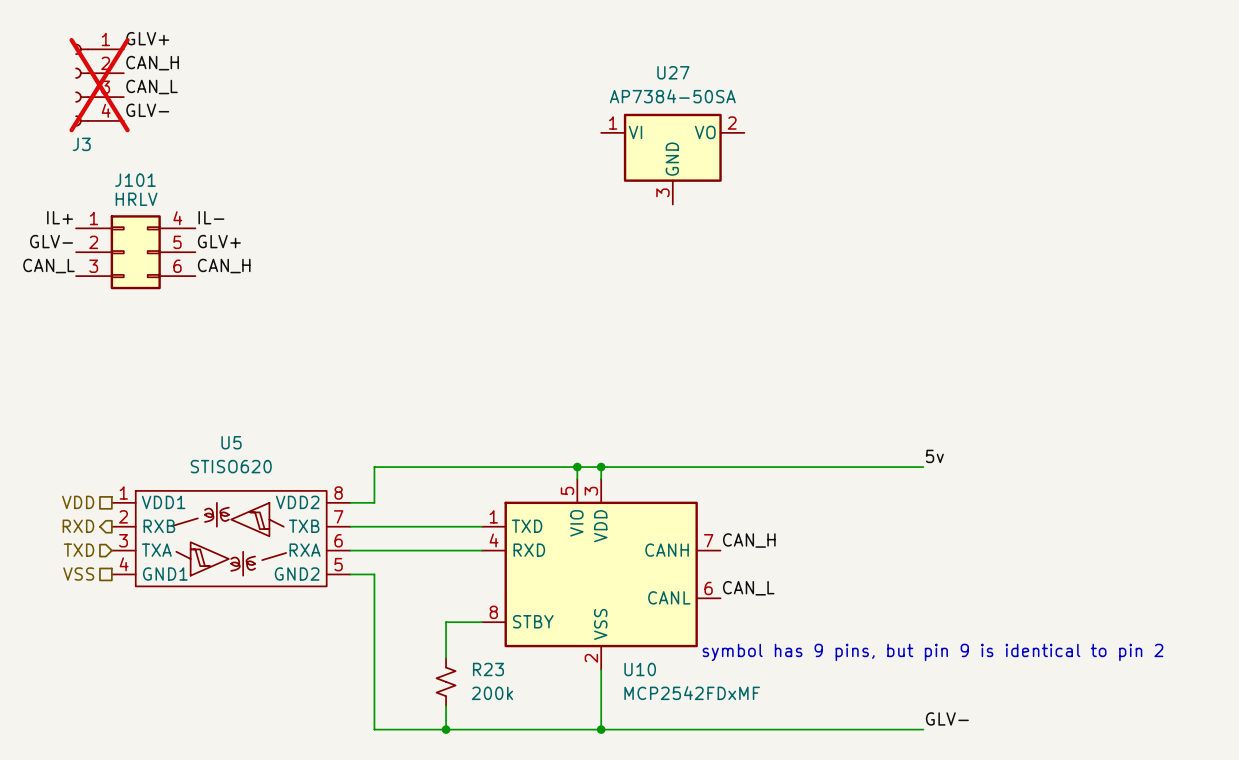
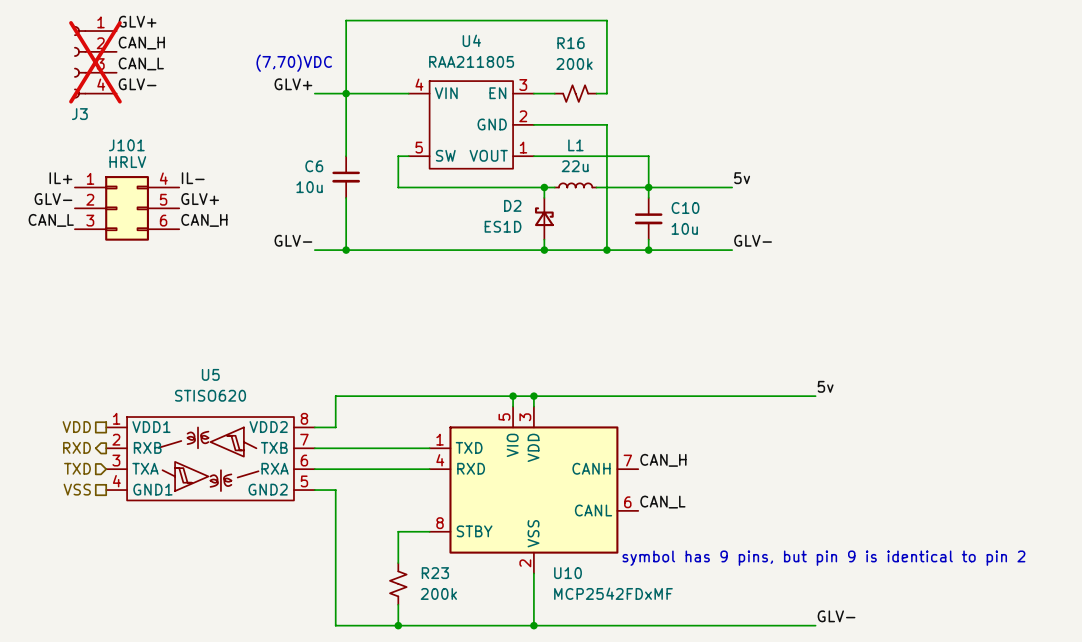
text: none -> (7,70)VDC (294, 63)
label: none -> GLV+ (293, 84)
wire: none -> (314, 93) (408, 93)
junction: none -> (346, 93)
wire: none -> (533, 93) (554, 93)
R16: none -> 200k (575, 93)
wire: none -> (596, 93) (606, 93) (606, 20) (346, 20) (346, 156)
U4: none -> RAA211805 (471, 124)
wire: none -> (533, 124) (606, 124) (606, 250)
U27: AP7384-50SA (672, 159) -> none
wire: none -> (408, 156) (398, 156) (398, 187) (554, 187)
wire: none -> (533, 156) (648, 156) (648, 197)
C6: none -> 10u (346, 177)
label: none -> 5v (742, 178)
L1: none -> 22u (575, 185)
wire: none -> (544, 187) (544, 197)
junction: none -> (544, 187)
wire: none -> (596, 187) (732, 187)
junction: none -> (648, 187)
wire: none -> (346, 197) (346, 250)
D2: none -> ES1D (544, 218)
C10: none -> 10u (648, 218)
wire: none -> (544, 239) (544, 250)
wire: none -> (648, 239) (648, 250)
label: none -> GLV- (293, 240)
label: none -> GLV- (753, 240)
wire: none -> (314, 250) (732, 250)
junction: none -> (346, 250)
junction: none -> (544, 250)
junction: none -> (606, 250)
junction: none -> (648, 250)

